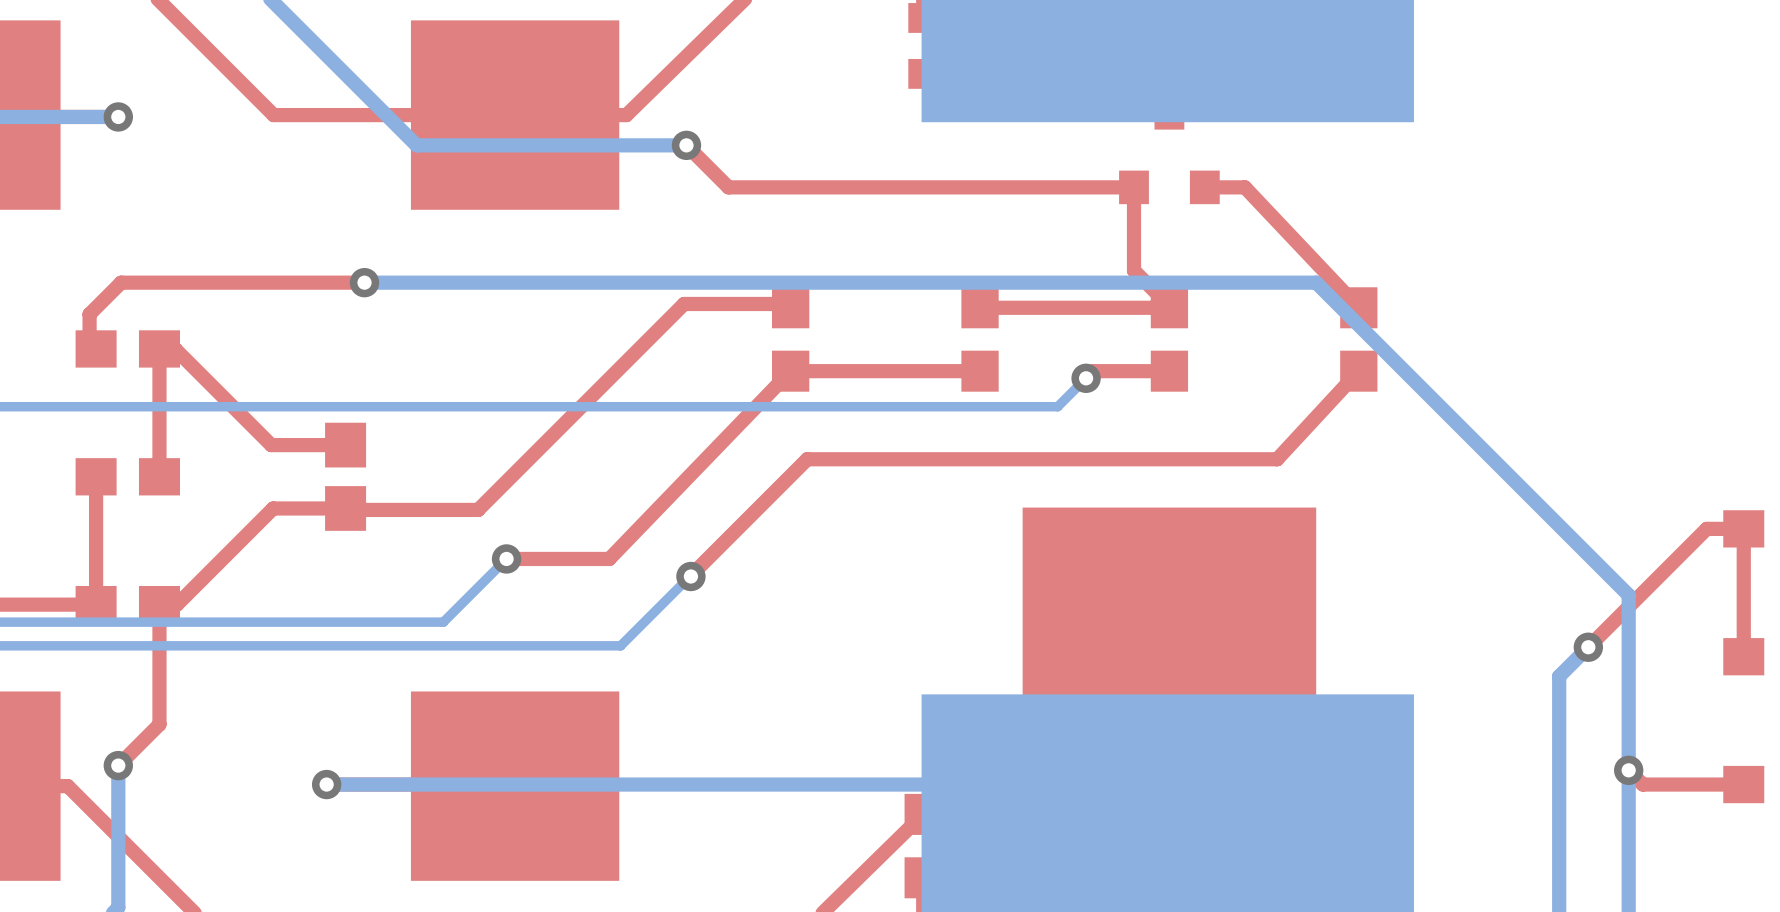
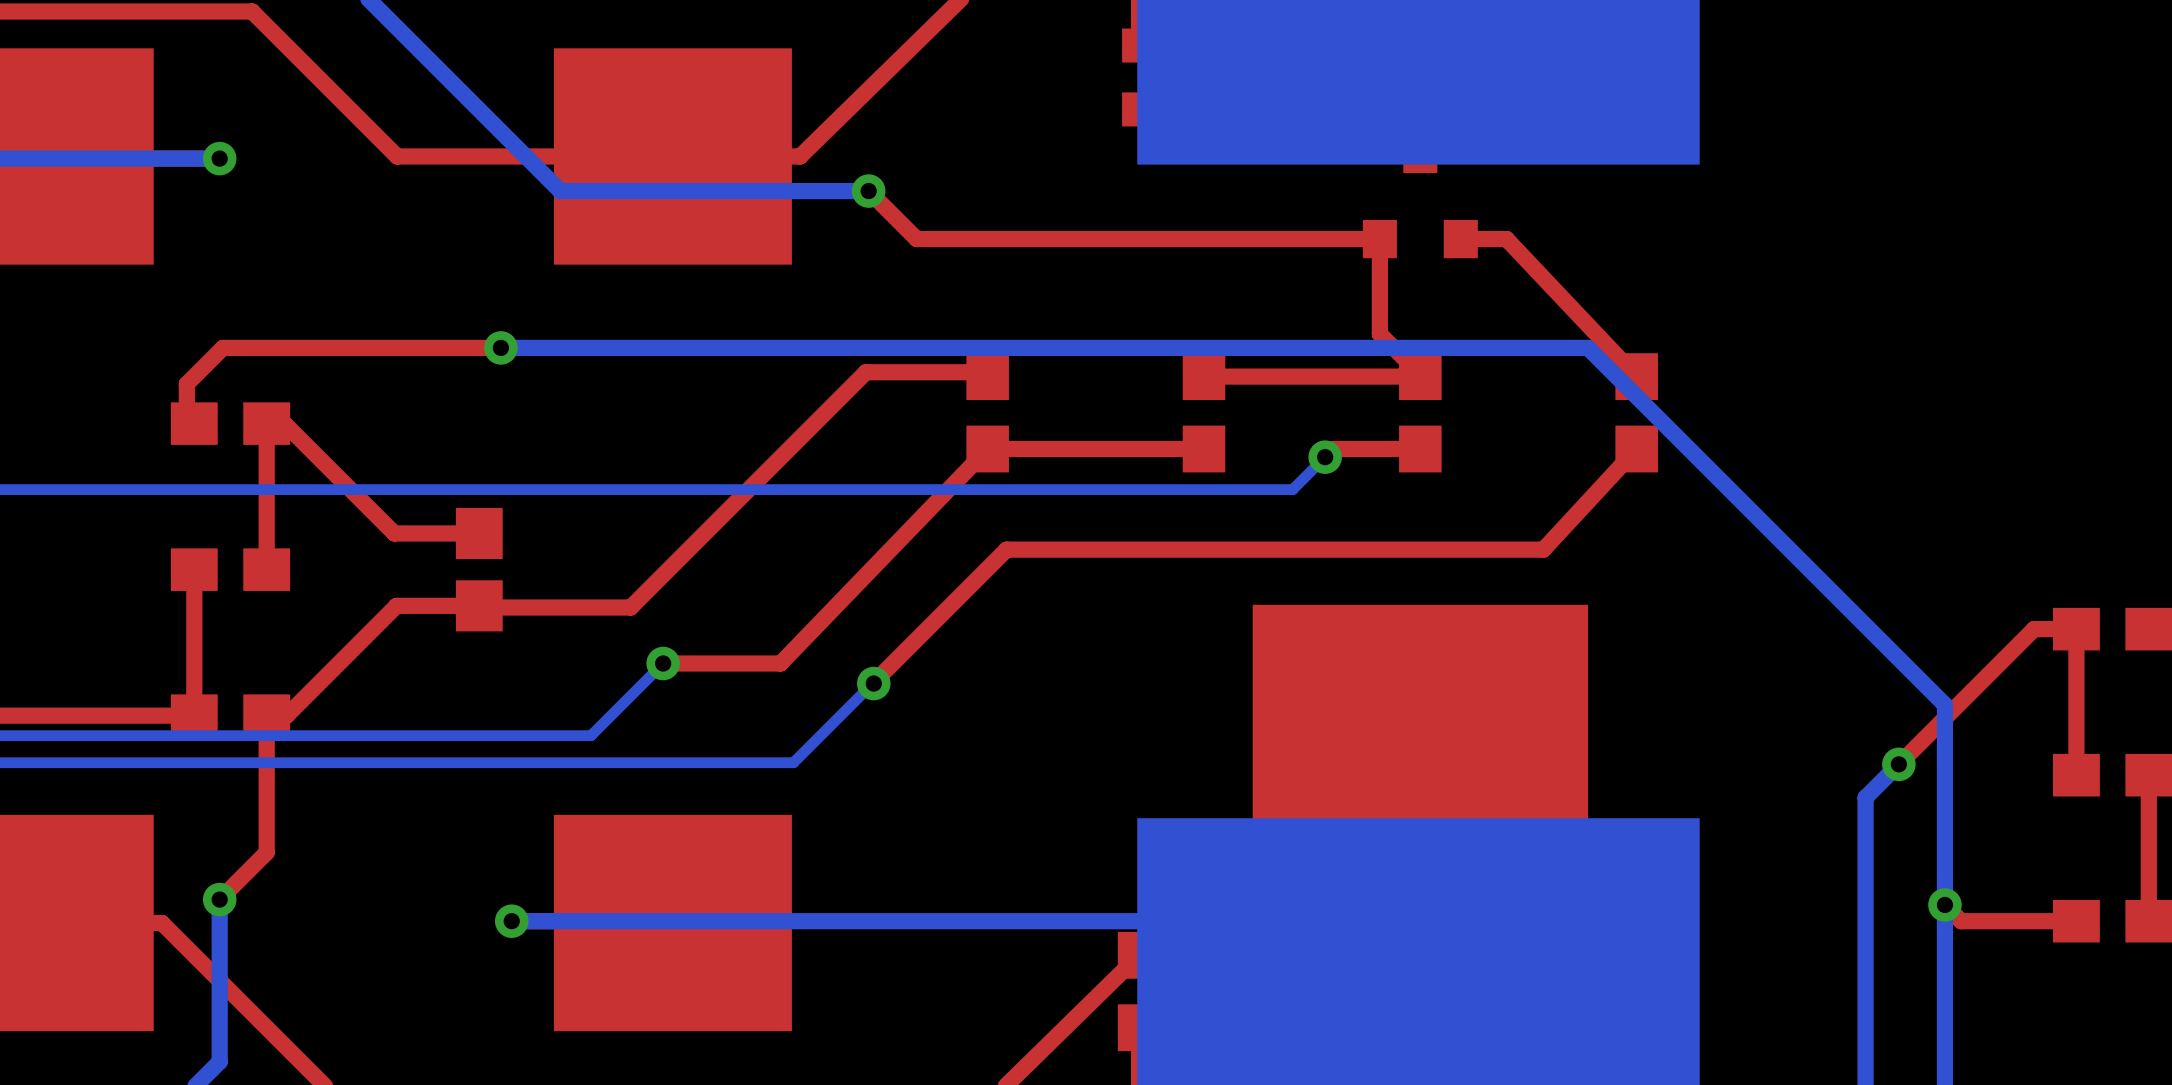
via position: (326, 784) -> (511, 921)
bottom track: (373, 784) (326, 784) -> none

